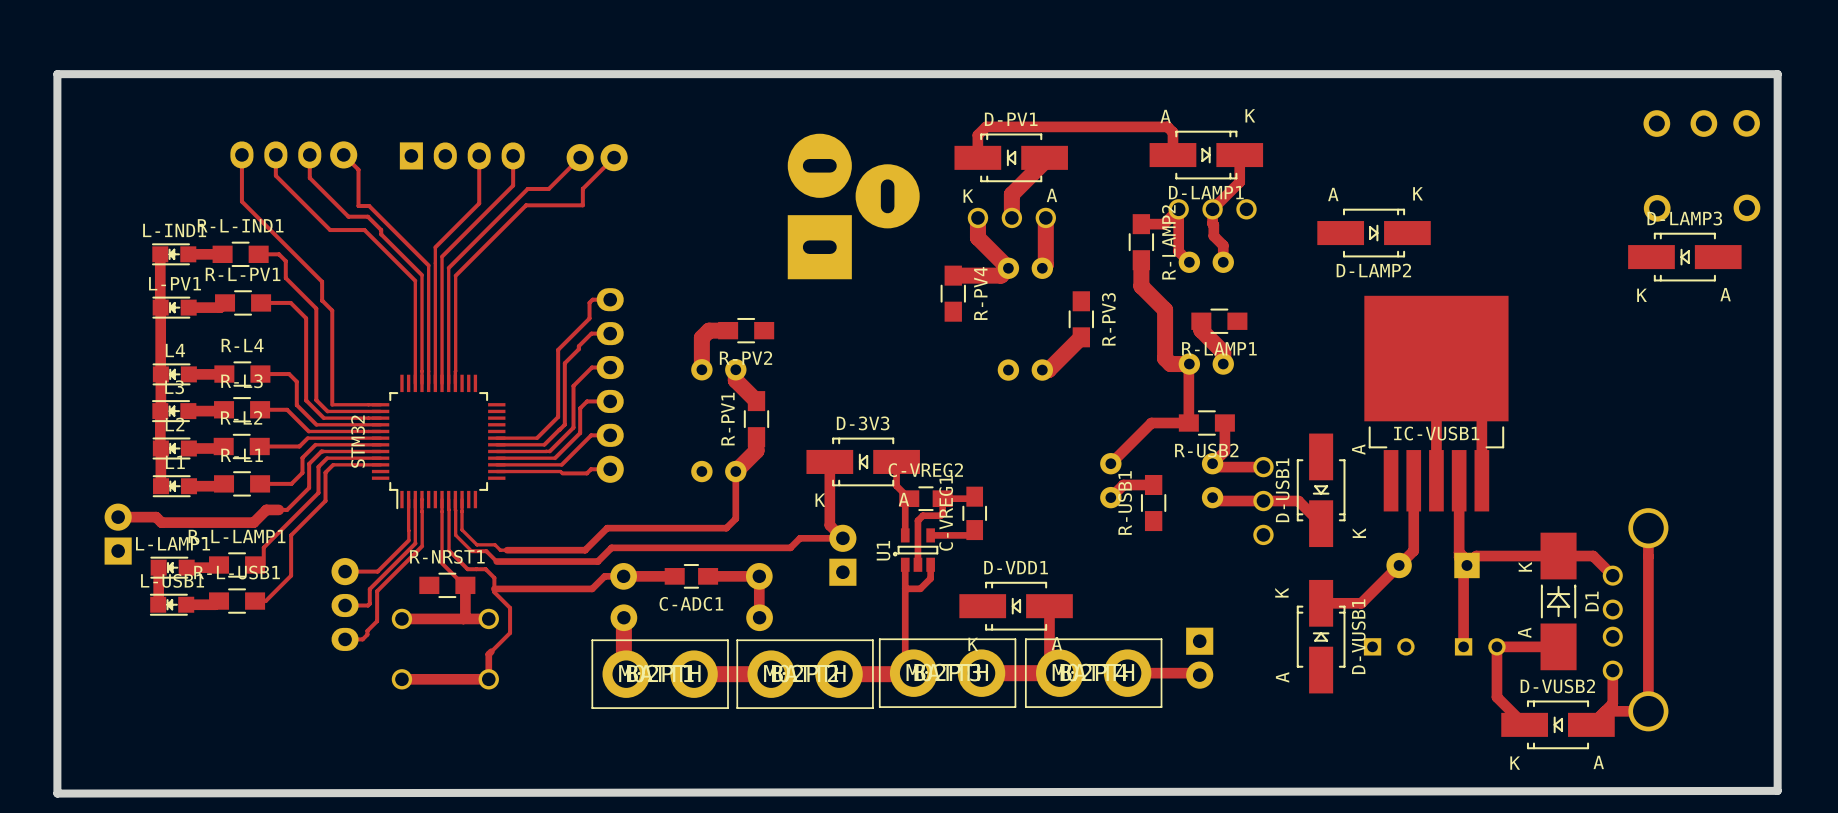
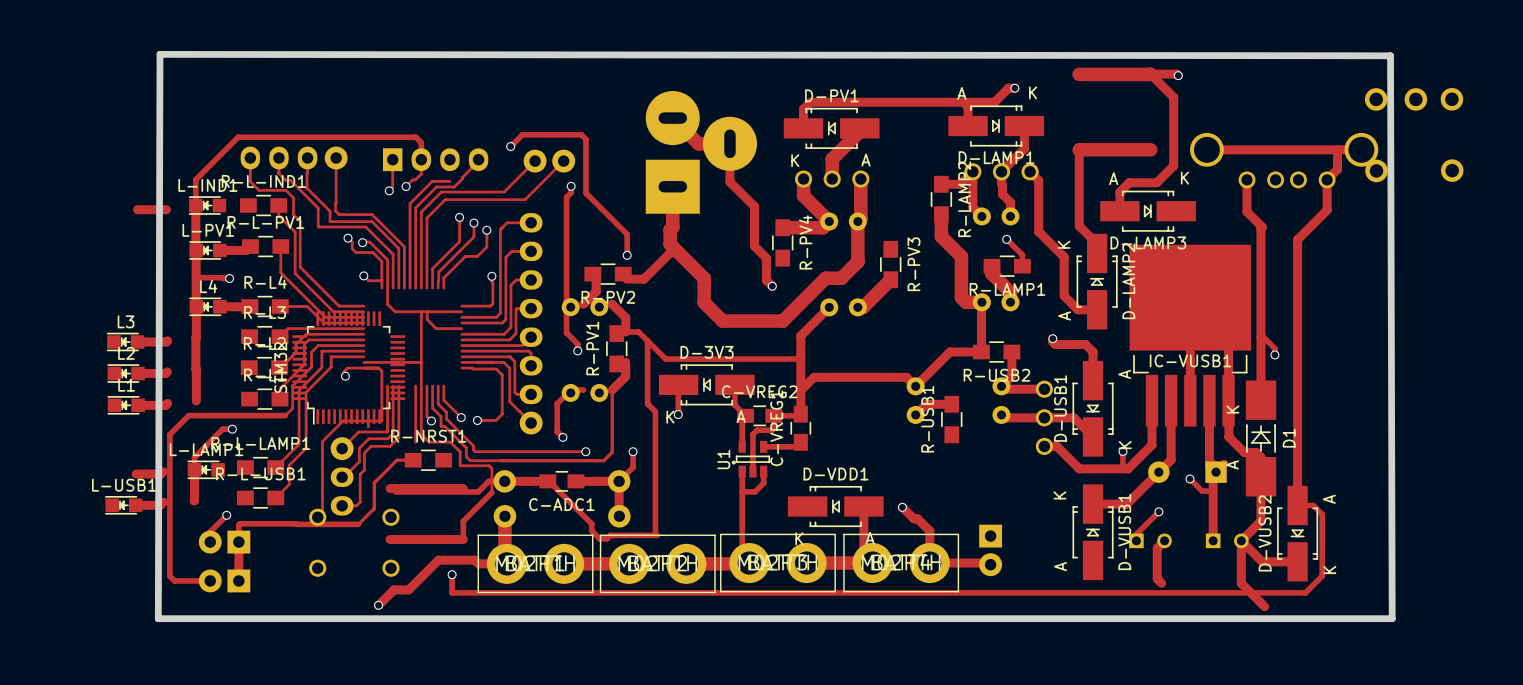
board edge: (57, 74) (57, 793) (1777, 790) (1777, 74) (57, 74) -> (160, 54) (158, 618) (1392, 618) (1390, 55) (160, 54)
track: none -> (1150, 74) (1178, 75)
track: none -> (1150, 74) (1173, 97) (1173, 165) (1156, 182) (1129, 182) (1119, 192) (1119, 211)
track: none -> (1150, 74) (1079, 74)
via: none -> (1178, 75)
track: none -> (1014, 88) (1008, 88) (994, 102) (963, 102)
via: none -> (1014, 88)
track: none -> (672, 118) (698, 143) (729, 143) (729, 182) (754, 206) (754, 246) (766, 258) (766, 280) (772, 286)
track: (241, 154) (241, 201) (322, 281) (322, 300) (332, 310) (332, 404) (380, 404) -> none
track: (275, 154) (275, 175) (330, 230) (364, 230) (415, 280) (415, 383) -> none
part position: (293, 154) -> (294, 158)
track: (309, 154) (309, 177) (348, 216) (367, 216) (381, 230) (381, 234) (421, 275) (421, 383) -> none
track: (343, 154) (358, 169) (358, 206) (369, 206) (428, 265) (428, 383) -> none
part position: (462, 155) -> (435, 159)
track: (479, 155) (479, 203) (435, 247) (435, 383) -> none
track: (513, 155) (513, 185) (442, 256) (442, 383) -> none
track: (580, 157) (548, 188) (527, 188) (448, 268) (448, 383) -> none
part position: (597, 157) -> (549, 161)
track: (614, 157) (582, 188) (582, 205) (526, 205) (455, 275) (455, 383) -> none
track: none -> (510, 146) (522, 134) (581, 134) (585, 139) (585, 193) (627, 234) (627, 255)
via: none -> (510, 146)
track: none -> (1150, 149) (1079, 150) (1079, 226) (1097, 243) (1097, 253)
track: none -> (1206, 149) (1361, 149)
track: none -> (1337, 149) (1337, 169) (1327, 179) (1327, 210) (1297, 239) (1297, 505) (1313, 505) (1322, 514) (1322, 576) (1305, 592) (452, 592)
track: none -> (250, 158) (249, 181) (259, 190) (286, 190) (293, 197) (293, 214) (300, 221) (300, 267) (339, 306) (363, 306)
track: none -> (278, 158) (278, 173) (285, 180) (290, 180) (318, 208) (318, 227) (365, 227) (393, 254) (393, 288)
track: none -> (307, 158) (306, 188) (330, 211) (330, 221) (372, 221) (398, 248) (398, 288)
track: none -> (336, 158) (335, 210) (339, 214) (372, 214) (404, 246) (404, 288)
track: none -> (392, 159) (392, 187) (389, 190)
track: none -> (478, 159) (454, 187) (436, 187) (415, 207) (415, 288)
track: none -> (535, 161) (504, 192) (441, 192) (421, 212) (421, 288)
track: none -> (563, 161) (525, 199) (445, 199) (426, 217) (426, 288)
part: none -> (1284, 160)
part position: (853, 206) -> (701, 152)
track: none -> (1030, 171) (1038, 180) (1038, 231) (1064, 257) (1064, 295) (1077, 309) (1097, 309)
track: none -> (1246, 179) (1246, 211) (1262, 227) (1261, 400)
track: none -> (450, 181) (432, 181) (410, 203) (410, 288)
track: none -> (406, 186) (421, 173) (421, 142) (415, 137) (238, 137) (195, 179) (196, 401)
via: none -> (406, 186)
track: none -> (571, 186) (571, 192) (566, 197) (566, 332) (577, 344) (577, 350)
via: none -> (571, 186)
track: none -> (672, 186) (672, 227) (670, 229) (670, 244) (704, 278) (704, 302) (722, 321) (782, 321) (825, 278) (841, 278) (857, 261) (857, 221)
via: none -> (389, 190)
D-LAMP2 rotation: 0° (1374, 233) -> 90° counterclockwise (1097, 281)
D-LAMP2 position: (1374, 233) -> (1097, 281)
track: none -> (278, 205) (278, 215) (295, 232) (295, 273) (333, 311) (363, 311)
track: (160, 254) (160, 486) -> none
L-IND1 position: (174, 254) -> (207, 205)
R-L-IND1 position: (240, 254) -> (263, 205)
track: (258, 254) (279, 254) (285, 261) (285, 278) (316, 308) (316, 400) (327, 411) (380, 411) -> none
D-LAMP3 rotation: 0° (1684, 257) -> 180° (1148, 211)
D-LAMP3 position: (1684, 257) -> (1148, 211)
track: none -> (459, 217) (459, 241) (432, 268) (432, 288)
via: none -> (459, 217)
track: none -> (531, 222) (507, 222) (500, 229) (500, 313) (496, 317) (461, 317)
track: none -> (473, 223) (473, 236) (438, 272) (438, 288)
via: none -> (473, 223)
track: none -> (486, 230) (486, 247) (477, 256) (465, 256) (443, 277) (443, 288)
via: none -> (486, 230)
track: none -> (348, 238) (352, 242) (352, 248) (355, 252) (372, 252) (381, 261) (381, 288)
via: none -> (348, 238)
track: none -> (1006, 239) (1022, 255) (1022, 266)
via: none -> (1006, 239)
track: none -> (362, 242) (369, 242) (387, 259) (387, 304) (395, 311) (461, 311)
via: none -> (362, 242)
track: none -> (280, 246) (280, 272) (325, 317) (363, 317)
track: (610, 299) (592, 299) (589, 302) (589, 318) (558, 349) (558, 416) (536, 438) (496, 438) -> none
track: (225, 302) (220, 307) (188, 307) -> (250, 246) (246, 250) (219, 250)
R-L-PV1 position: (243, 302) -> (265, 246)
track: (269, 302) (290, 302) (306, 318) (306, 400) (323, 418) (380, 418) -> none
track: none -> (531, 251) (511, 251) (505, 257) (505, 319) (502, 323) (461, 323)
track: none -> (677, 251) (671, 251) (644, 279) (626, 279)
L-PV1 position: (174, 307) -> (207, 250)
via: none -> (627, 255)
track: (728, 330) (709, 330) (701, 337) (701, 369) -> none
track: none -> (363, 275) (368, 280) (381, 280)
via: none -> (363, 275)
track: none -> (491, 276) (492, 303) (490, 306) (461, 306)
via: none -> (491, 276)
track: (610, 333) (591, 333) (564, 363) (564, 424) (559, 429) (544, 444) (496, 444) -> none
track: none -> (196, 277) (229, 278)
via: none -> (229, 278)
track: none -> (596, 279) (596, 291) (583, 304)
track: none -> (531, 279) (516, 279) (510, 285) (510, 327) (504, 334) (461, 334)
via: none -> (772, 286)
track: none -> (612, 304) (625, 317) (625, 332) (638, 332) (665, 359) (797, 359) (800, 355)
track: (610, 367) (591, 367) (573, 385) (573, 427) (549, 451) (496, 451) -> none
track: none -> (280, 306) (307, 306) (323, 323) (363, 323)
track: (735, 369) (735, 380) (756, 401) -> none
track: none -> (829, 307) (800, 335) (800, 414)
track: none -> (531, 308) (516, 309) (516, 333) (509, 339) (461, 339)
L4 position: (174, 374) -> (207, 306)
track: (224, 374) (188, 374) -> (249, 306) (219, 306)
R-L4 position: (242, 374) -> (265, 306)
track: (269, 374) (289, 374) (296, 381) (296, 405) (316, 424) (380, 424) -> none
track: none -> (421, 311) (421, 434) (429, 442) (450, 442) (460, 451) (460, 465) (489, 465) (491, 468) (491, 492) (463, 521) (463, 539) (390, 539)
track: none -> (427, 311) (427, 319) (436, 328) (461, 328)
part: (610, 385) -> none
part: none -> (531, 323)
track: none -> (363, 328) (287, 328) (280, 336)
track: none -> (363, 334) (306, 334) (296, 344) (296, 352) (279, 367)
track: (610, 401) (587, 401) (580, 408) (580, 433) (555, 458) (496, 458) -> none
track: none -> (1261, 336) (1274, 348) (1274, 354)
track: none -> (531, 337) (522, 345) (461, 345)
track: none -> (1052, 338) (1055, 344) (1085, 344) (1093, 351) (1093, 380)
via: none -> (1052, 338)
track: none -> (363, 339) (308, 339) (304, 344) (304, 364) (280, 389) (280, 399)
R-L3 position: (242, 409) -> (264, 336)
track: (268, 409) (287, 409) (308, 431) (380, 431) -> none
track: none -> (647, 340) (647, 403) (655, 411) (655, 533) (657, 535) (610, 535) (606, 538) (599, 538) (591, 530) (591, 523) (547, 481)
track: none -> (363, 345) (318, 345) (311, 352) (311, 367) (292, 386) (292, 408) (285, 415) (188, 415) (169, 434) (169, 576) (174, 580) (210, 580)
via: none -> (577, 350)
track: none -> (363, 351) (321, 351) (321, 367) (299, 390) (299, 444) (277, 467)
track: none -> (461, 351) (529, 351) (531, 353) (531, 365)
via: none -> (1274, 354)
track: none -> (363, 356) (331, 356) (331, 367) (306, 392) (306, 448) (289, 465) (289, 484) (277, 497)
track: none -> (461, 356) (510, 356) (514, 361) (514, 392) (516, 394) (531, 394)
track: none -> (421, 362) (363, 362)
track: (591, 435) (561, 464) (496, 464) -> (477, 362) (461, 362)
track: none -> (493, 362) (503, 362) (509, 368) (509, 401) (531, 423)
track: none -> (625, 362) (625, 376) (612, 390) (612, 452) (603, 460) (470, 460) (466, 456) (466, 448) (444, 426) (441, 426) (441, 416) (432, 408) (432, 386)
track: (756, 437) (756, 450) (735, 471) (735, 518) (726, 528) (607, 528) (585, 550) (500, 550) (495, 544) (477, 544) (462, 529) (462, 511) -> none
track: (380, 438) (307, 438) (299, 446) (268, 446) -> none
track: none -> (461, 368) (496, 369) (502, 375) (502, 414) (495, 420) (477, 420)
track: (380, 444) (315, 444) (302, 457) (302, 472) (291, 483) (268, 483) -> none
R-L2 position: (241, 446) -> (264, 367)
track: (380, 451) (321, 451) (309, 463) (309, 487) (287, 509) (266, 509) (253, 522) (161, 522) (156, 517) (118, 517) -> none
track: none -> (345, 376) (344, 371) (347, 368) (378, 368) (381, 371) (381, 421) (343, 421) (322, 441) (322, 524)
via: none -> (345, 376)
track: (380, 458) (327, 458) (318, 466) (318, 492) (263, 547) (263, 565) -> none
track: (829, 461) (829, 525) (842, 538) (800, 538) (790, 547) (611, 547) (597, 561) (496, 561) (486, 551) (471, 551) (455, 535) (455, 499) -> (678, 384) (678, 414)
track: none -> (387, 386) (387, 431) (358, 431) (342, 448)
track: none -> (393, 386) (393, 433) (387, 438) (368, 438) (359, 448) (359, 461) (342, 477)
track: none -> (398, 386) (398, 437) (390, 446) (370, 446) (364, 453) (364, 470) (360, 474) (360, 502) (356, 505) (342, 505)
track: none -> (415, 386) (415, 442)
track: none -> (426, 386) (426, 416) (431, 421)
track: none -> (438, 386) (438, 404) (446, 412) (446, 419) (473, 445) (475, 451) (585, 451)
track: none -> (443, 386) (443, 400) (461, 417)
track: none -> (915, 386) (906, 377) (814, 377) (800, 390)
track: (380, 464) (333, 464) (325, 472) (325, 500) (291, 535) (291, 575) (263, 601) -> none
track: none -> (583, 390) (570, 390) (557, 403) (557, 431) (562, 437)
track: (496, 471) (586, 473) (591, 469) (610, 469) (607, 471) -> none
track: none -> (1152, 400) (1152, 444) (1128, 468) (1079, 468) (1056, 446) (1044, 446)
track: none -> (1228, 400) (1228, 437) (1244, 452) (1256, 452) (1261, 457) (1261, 521) (1241, 540) (1262, 561) (1297, 561)
R-L1 position: (242, 483) -> (264, 399)
via: none -> (678, 414)
track: (408, 499) (408, 540) (377, 571) (345, 571) -> none
track: (415, 499) (415, 543) (369, 589) (368, 605) (345, 605) -> none
track: (422, 499) (422, 546) (377, 591) (377, 621) (367, 630) (367, 634) (362, 639) (345, 639) -> none
track: (442, 499) (442, 563) (465, 585) (465, 616) (463, 618) -> none
track: (448, 499) (449, 550) (467, 569) (485, 569) (494, 577) (494, 592) (510, 607) (510, 632) (488, 654) (488, 679) (401, 679) -> none
via: none -> (461, 417)
via: none -> (431, 421)
via: none -> (477, 420)
track: none -> (232, 429) (222, 429) (194, 457) (194, 501)
via: none -> (232, 429)
via: none -> (562, 437)
track: (1648, 528) (1648, 711) (1604, 711) -> none
part: (118, 534) -> none
track: none -> (1122, 451) (1122, 467) (1121, 468)
via: none -> (1122, 451)
via: none -> (585, 451)
track: none -> (633, 451) (633, 467) (619, 481)
via: none -> (633, 451)
track: none -> (413, 460) (397, 460) (374, 482) (374, 508) (358, 524) (240, 523) (238, 580)
part: (842, 555) -> none
track: (1476, 556) (1593, 556) (1612, 575) -> none
R-L-LAMP1 position: (237, 565) -> (260, 467)
track: (158, 567) (158, 604) -> none
L-LAMP1 position: (172, 567) -> (206, 469)
track: none -> (1189, 478) (1202, 491) (1213, 491)
via: none -> (1189, 478)
R-NRST1 position: (447, 585) -> (428, 460)
R-L-USB1 position: (237, 601) -> (260, 497)
D1 position: (1558, 601) -> (1261, 438)
part position: (345, 604) -> (342, 476)
track: none -> (902, 507) (929, 530) (929, 563)
via: none -> (902, 507)
track: none -> (1158, 511) (1136, 534) (1136, 540)
via: none -> (1158, 511)
track: none -> (226, 515) (210, 531) (210, 542)
via: none -> (226, 515)
track: (401, 618) (488, 618) -> (390, 488) (463, 488)
part: (1635, 619) -> none
track: none -> (1164, 540) (1157, 548) (1157, 578) (1161, 583)
track: (1496, 646) (1558, 646) -> none
part: none -> (224, 542)
track: (1612, 670) (1612, 703) (1591, 724) -> none
track: none -> (506, 563) (478, 563) (474, 560) (438, 560) (408, 589) (394, 589) (378, 605)
track: none -> (452, 574) (452, 592)
via: none -> (452, 574)
part: none -> (224, 580)
via: none -> (378, 605)
D-VUSB2 rotation: 0° (1558, 724) -> 90° counterclockwise (1297, 533)
D-VUSB2 position: (1558, 724) -> (1297, 533)

